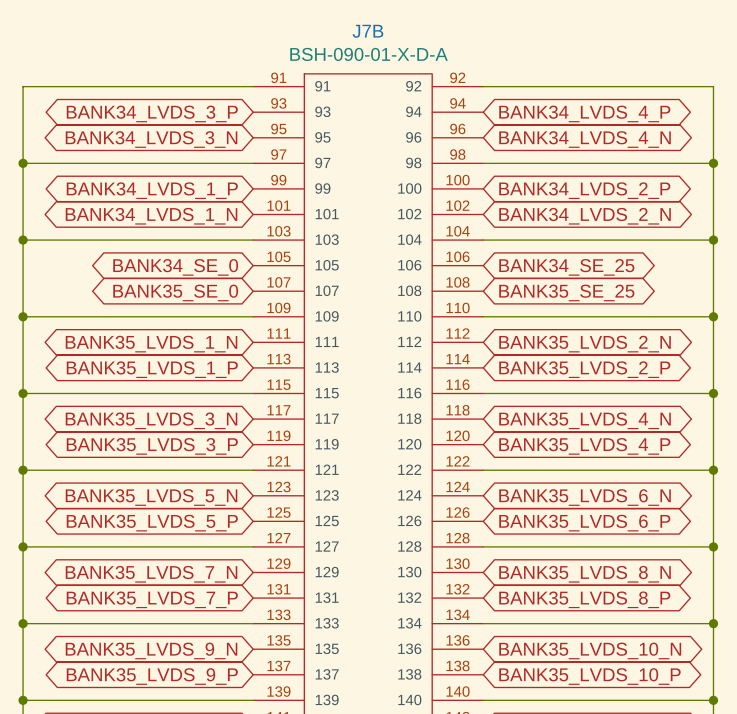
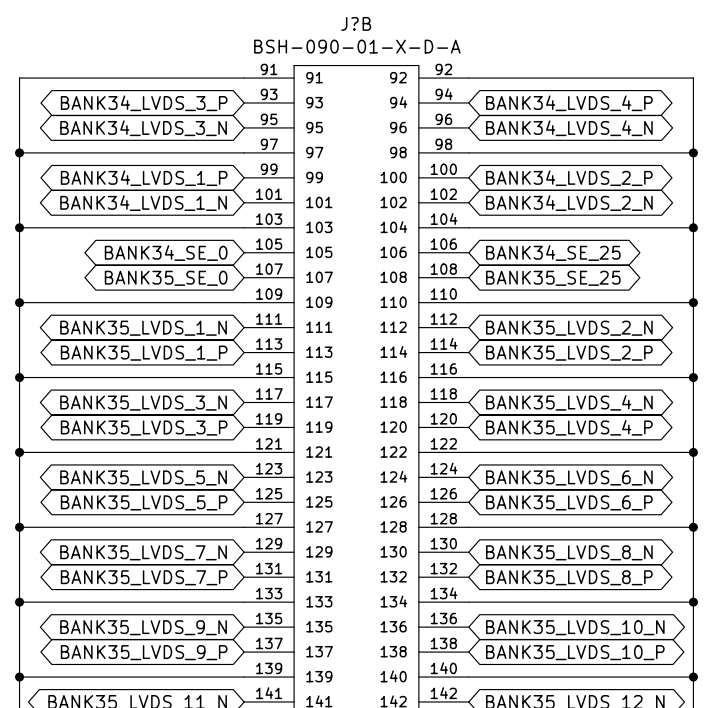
J7B name: J7B (367, 31) -> J?B (356, 23)

